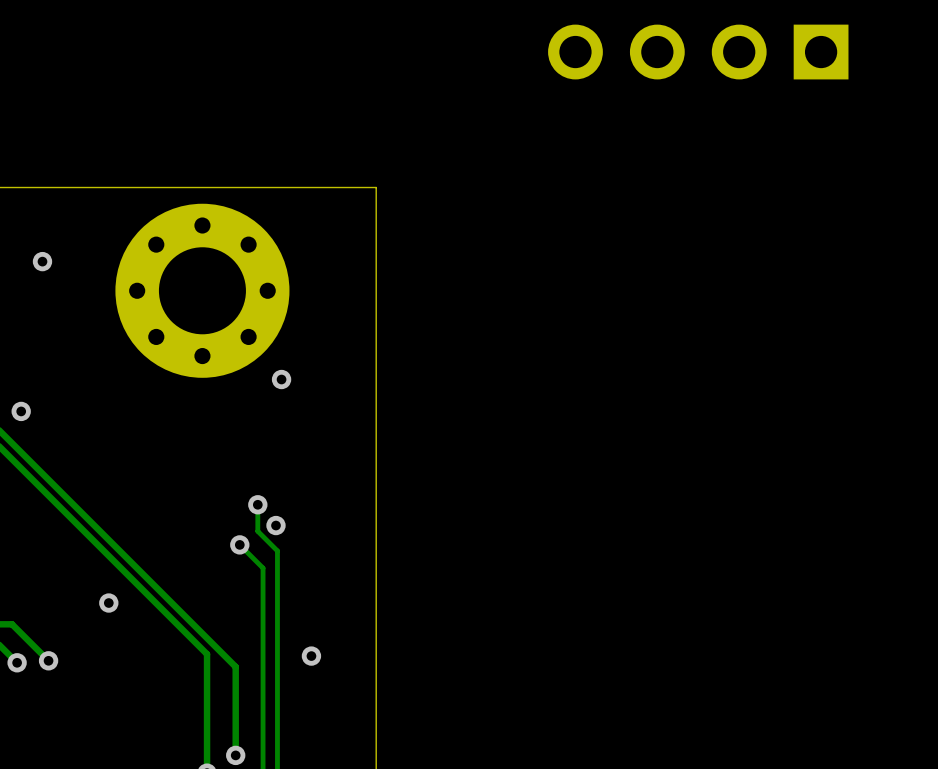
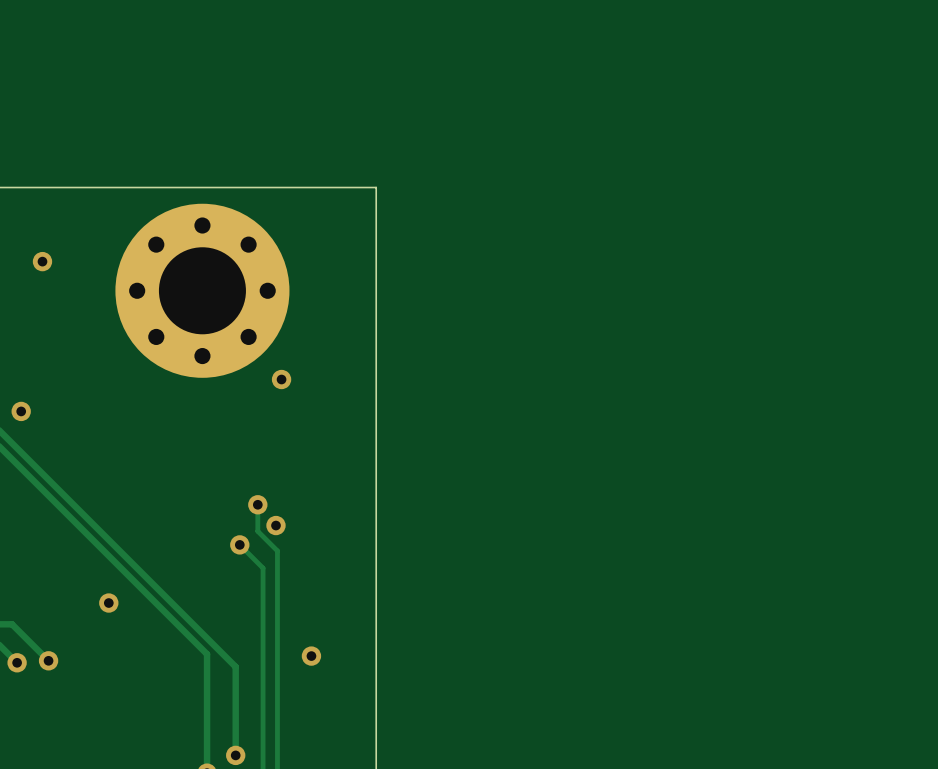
part: (698, 52) -> none

